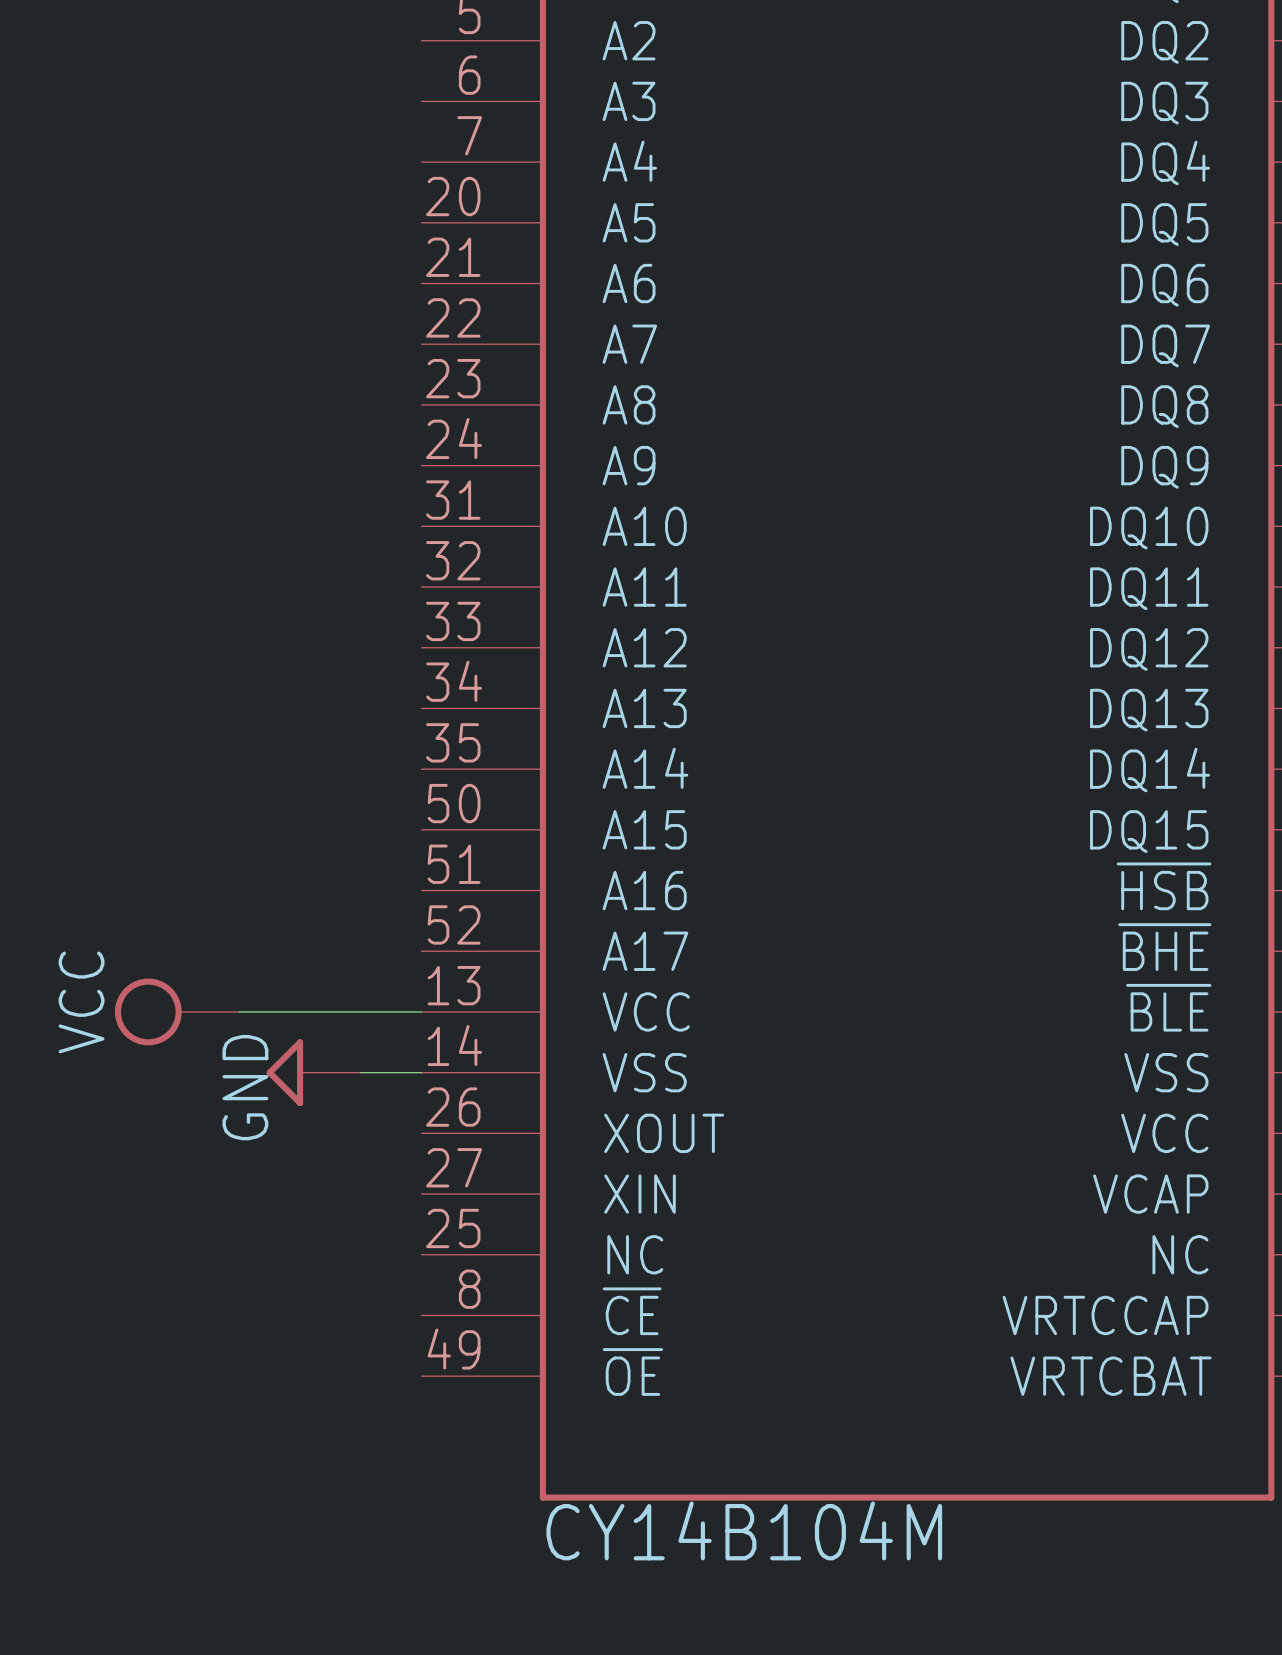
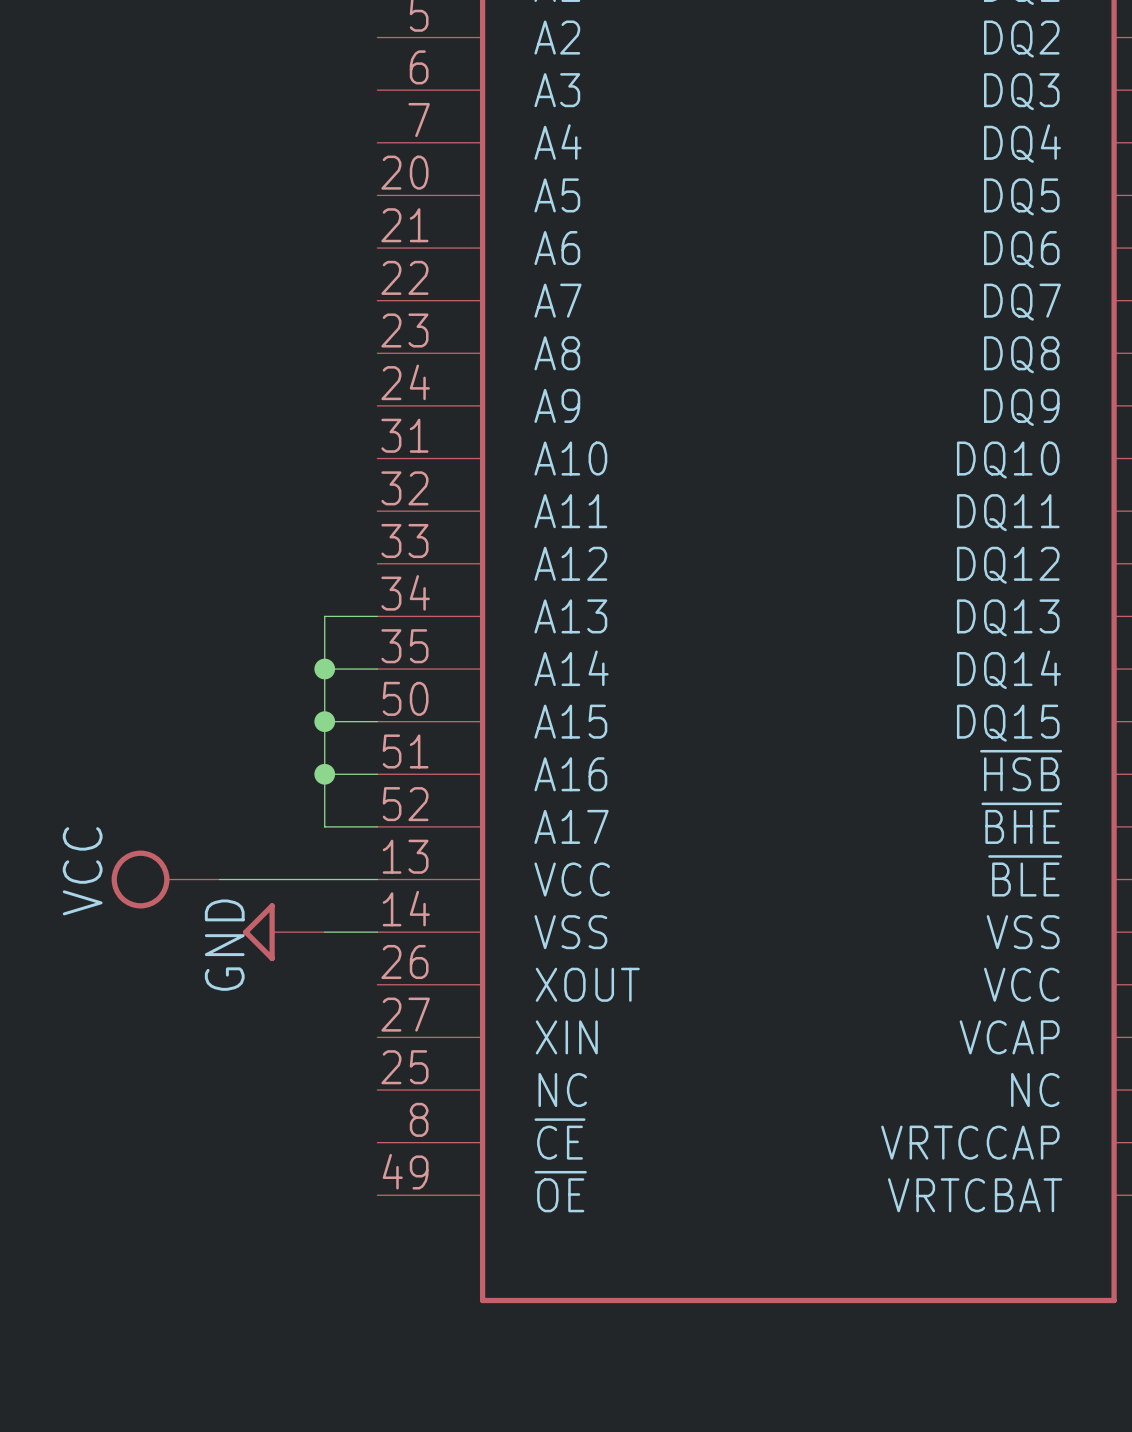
wire: none -> (377, 616) (324, 616) (324, 826) (377, 826)
wire: none -> (324, 669) (377, 669)
junction: none -> (324, 669)
wire: none -> (324, 721) (377, 721)
junction: none -> (324, 721)
wire: none -> (324, 774) (377, 774)
junction: none -> (324, 774)
part value: CY14B104M (744, 1530) -> none

